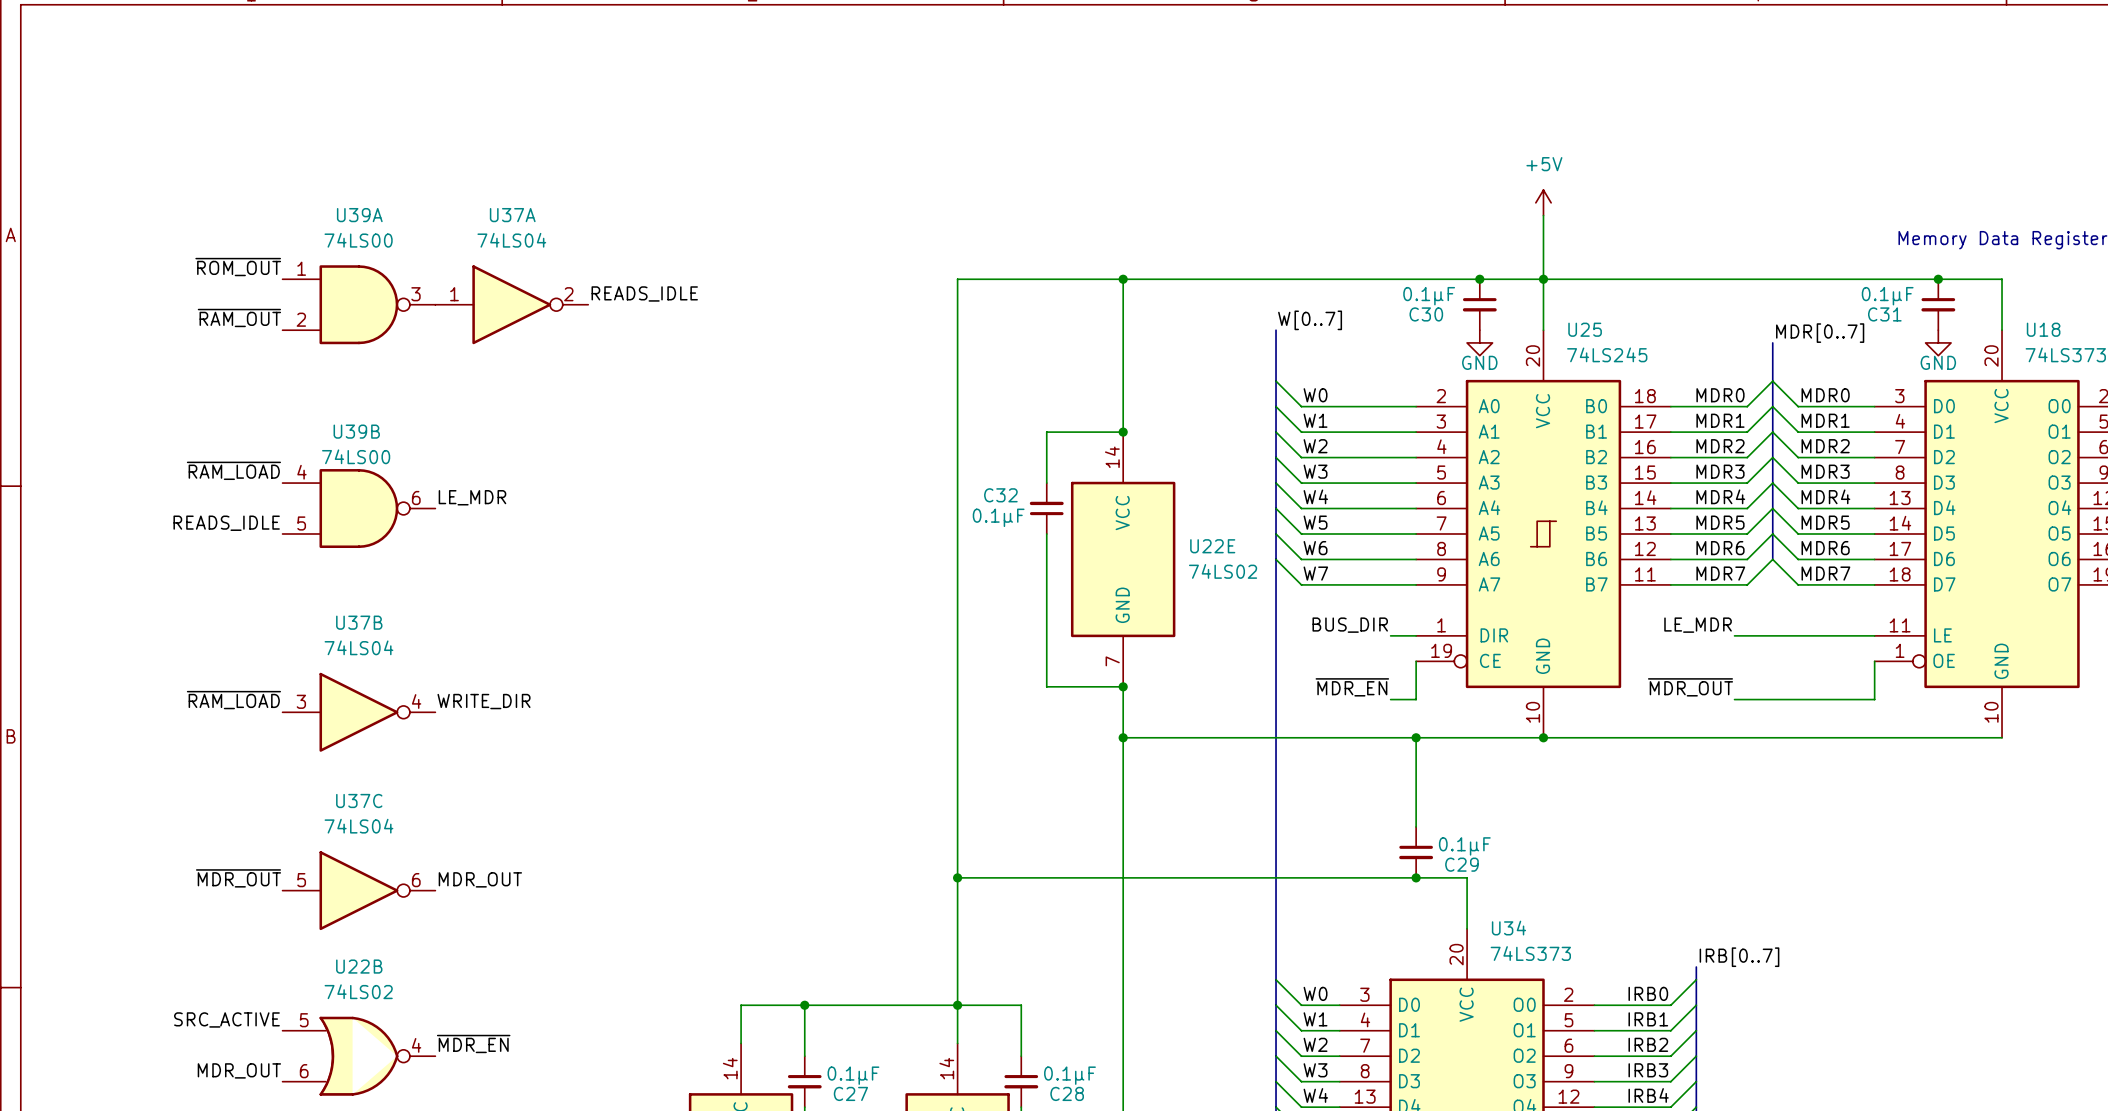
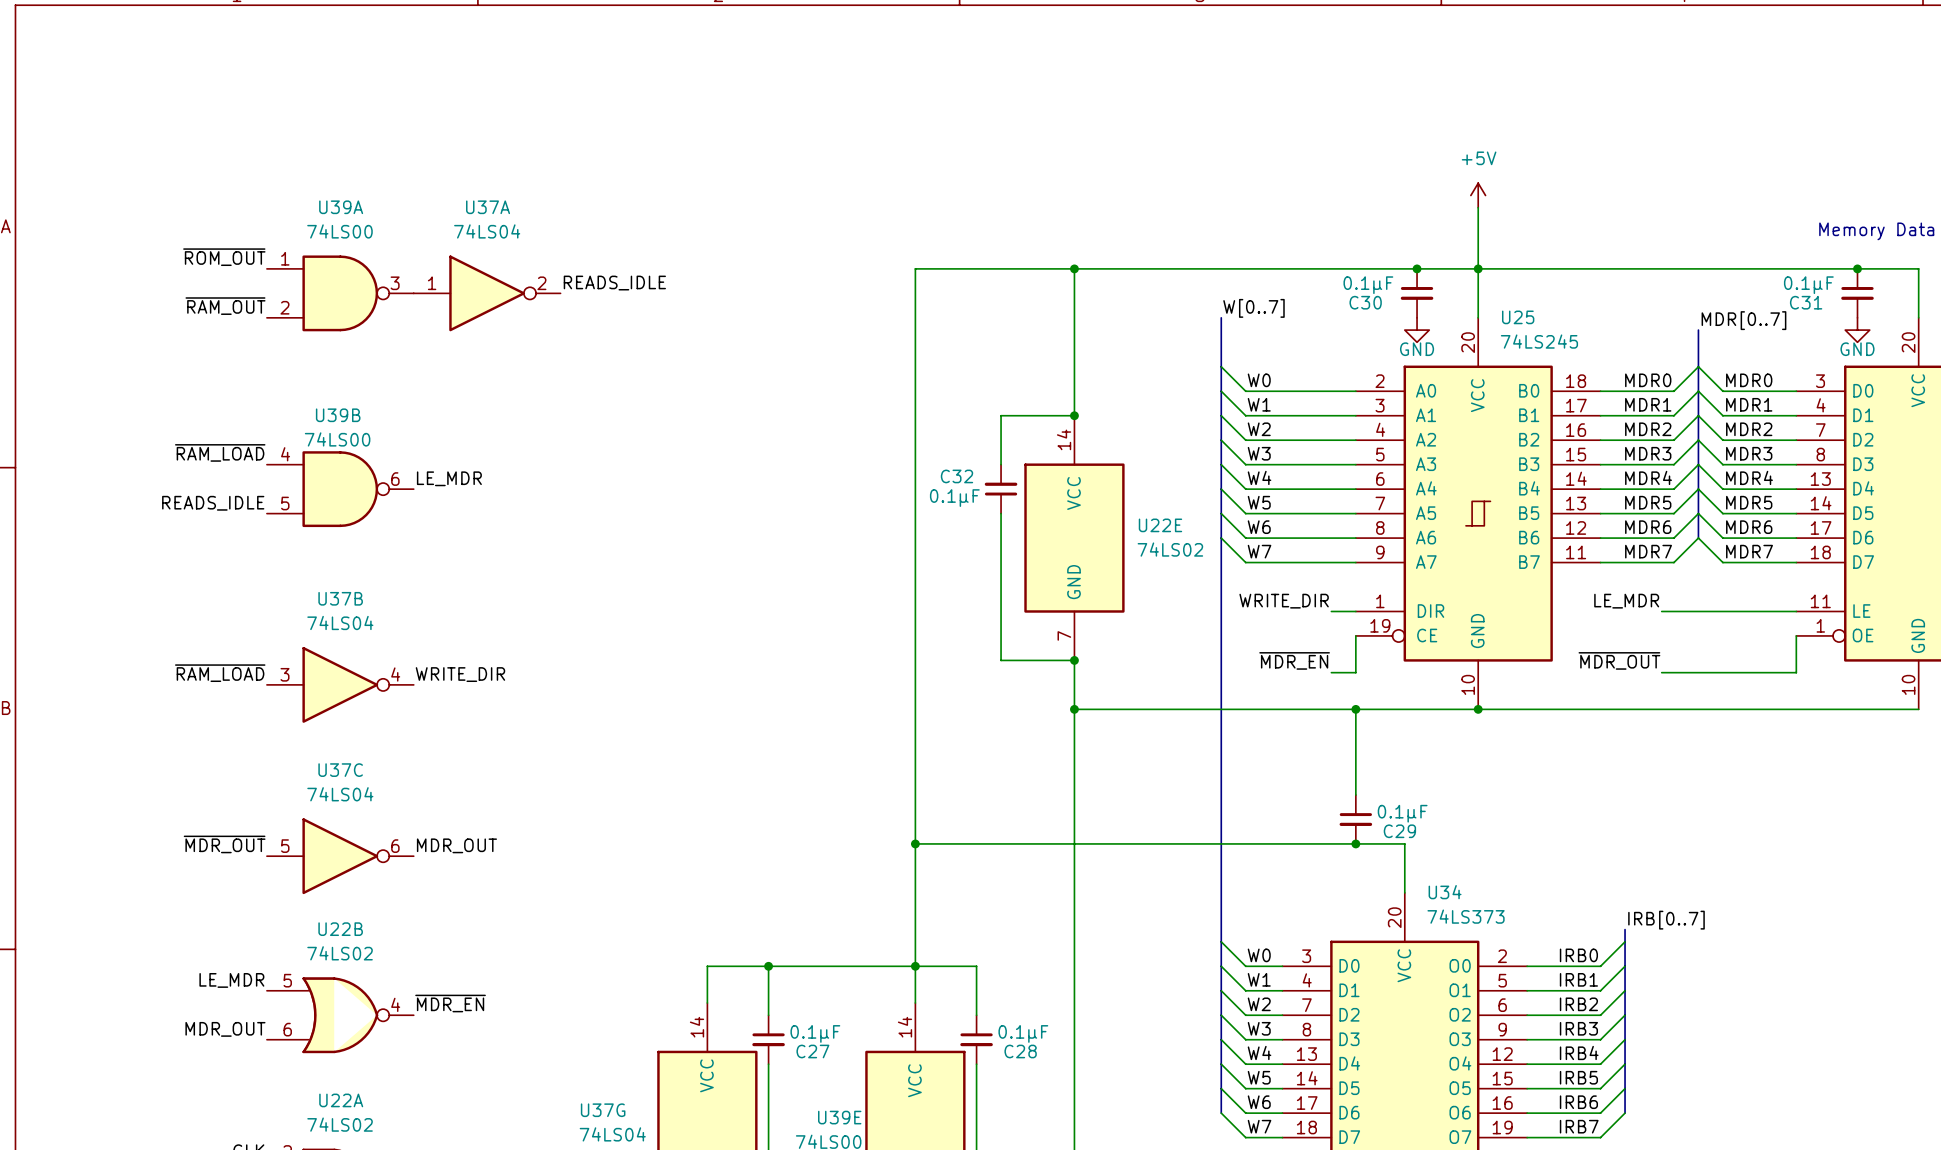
label: BUS_DIR (1350, 625) -> WRITE_DIR (1284, 601)
label: SRC_ACTIVE (226, 1019) -> LE_MDR (231, 980)

